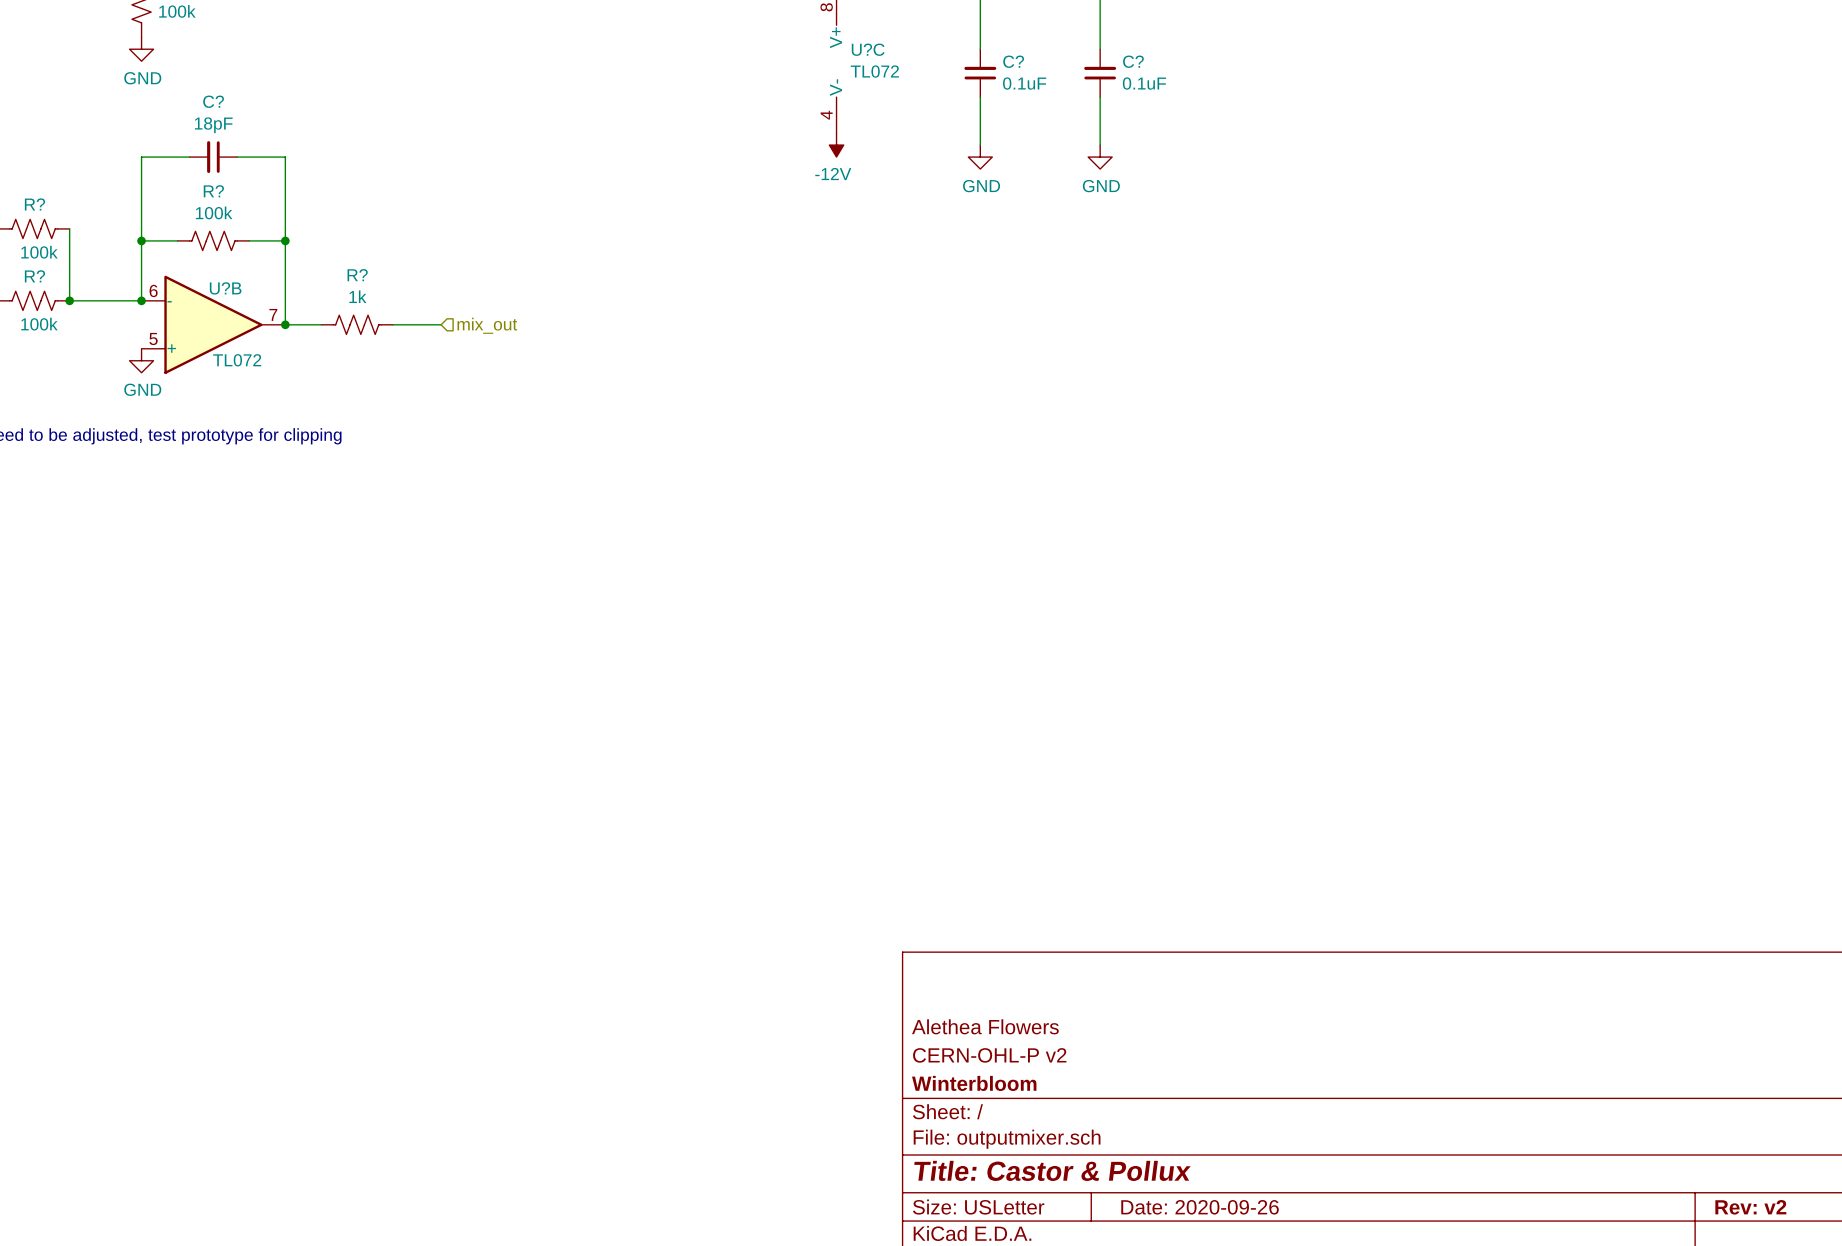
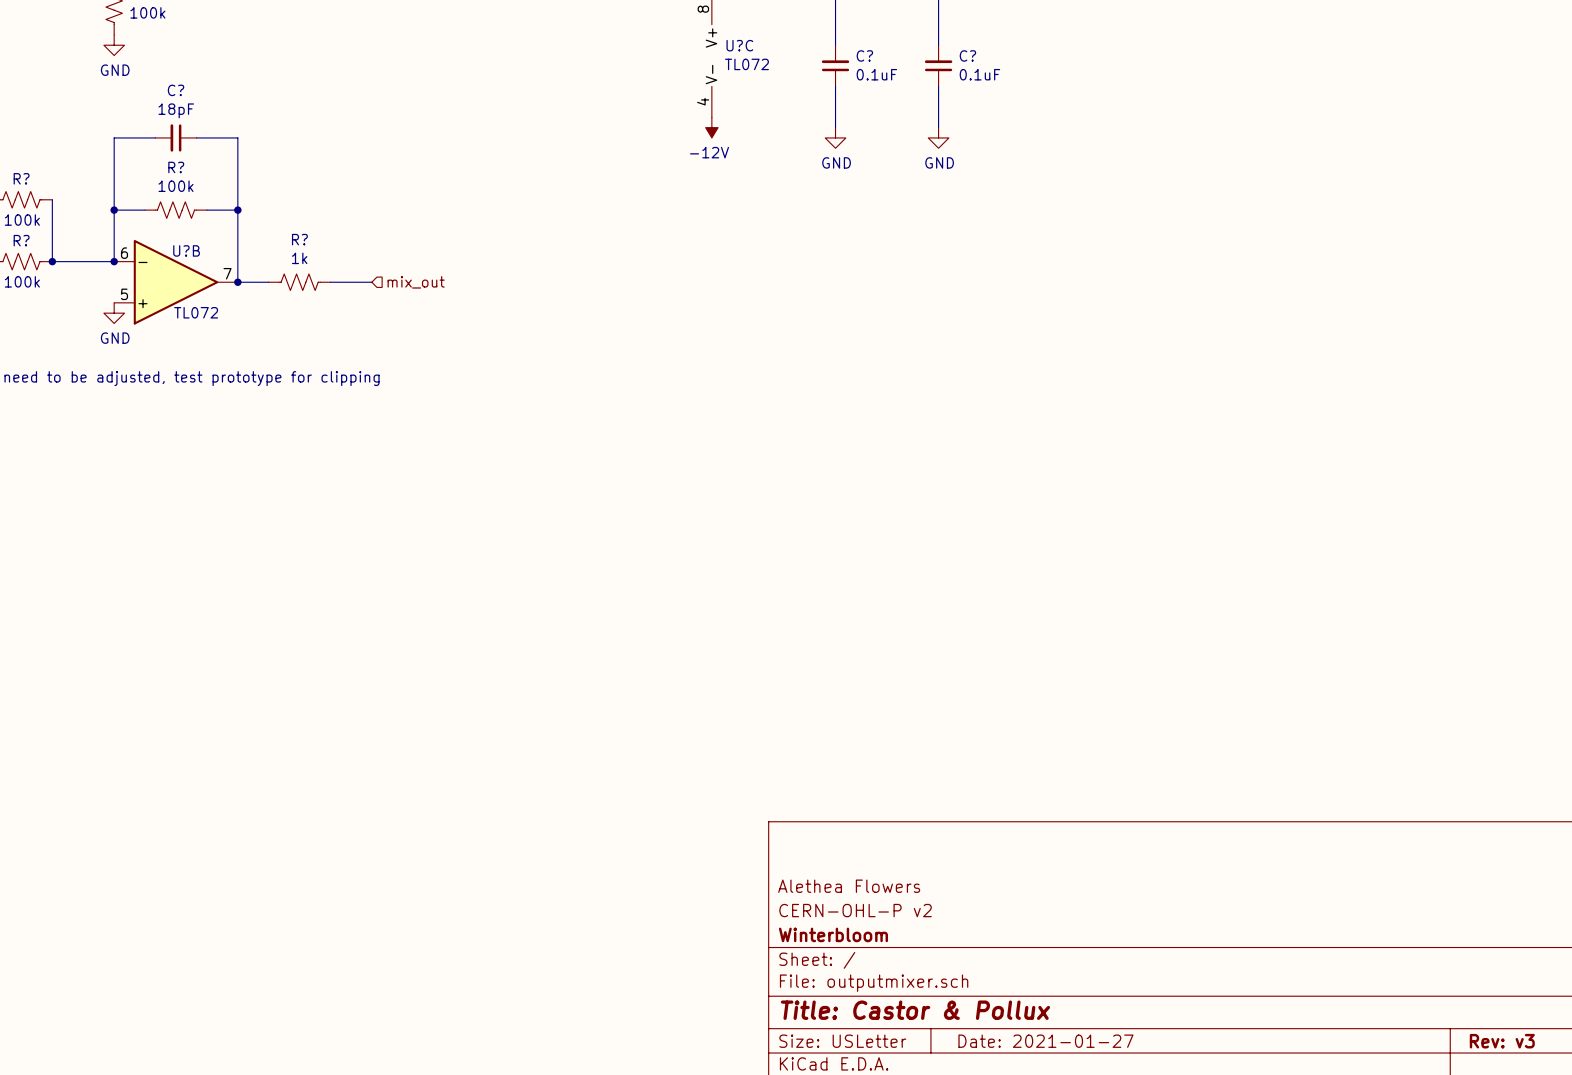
title block: Date: 2020-09-26 (1200, 1207) -> Date: 2021-01-27 (1045, 1041)
title block: Rev: v2 (1750, 1207) -> Rev: v3 (1502, 1041)

